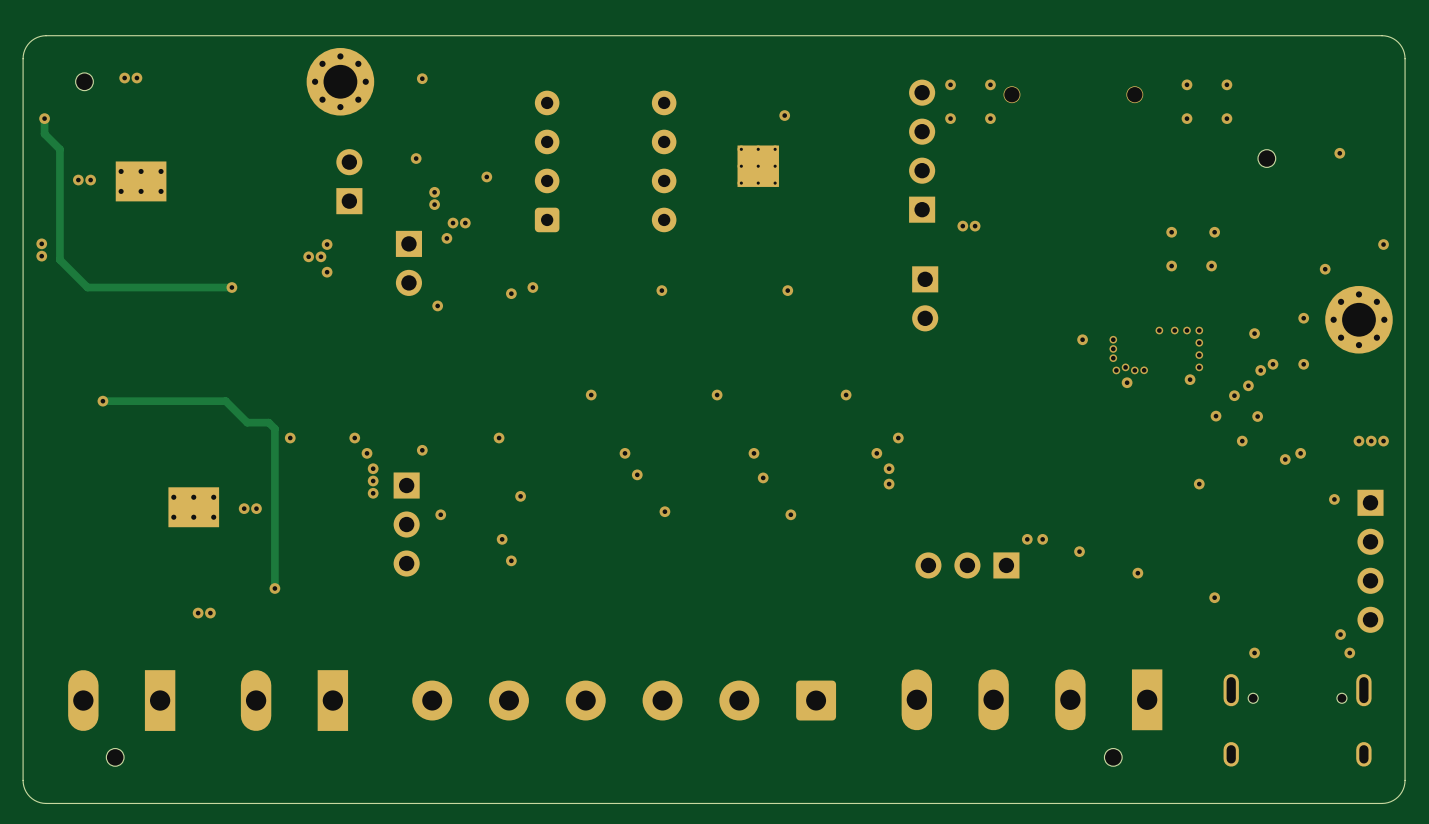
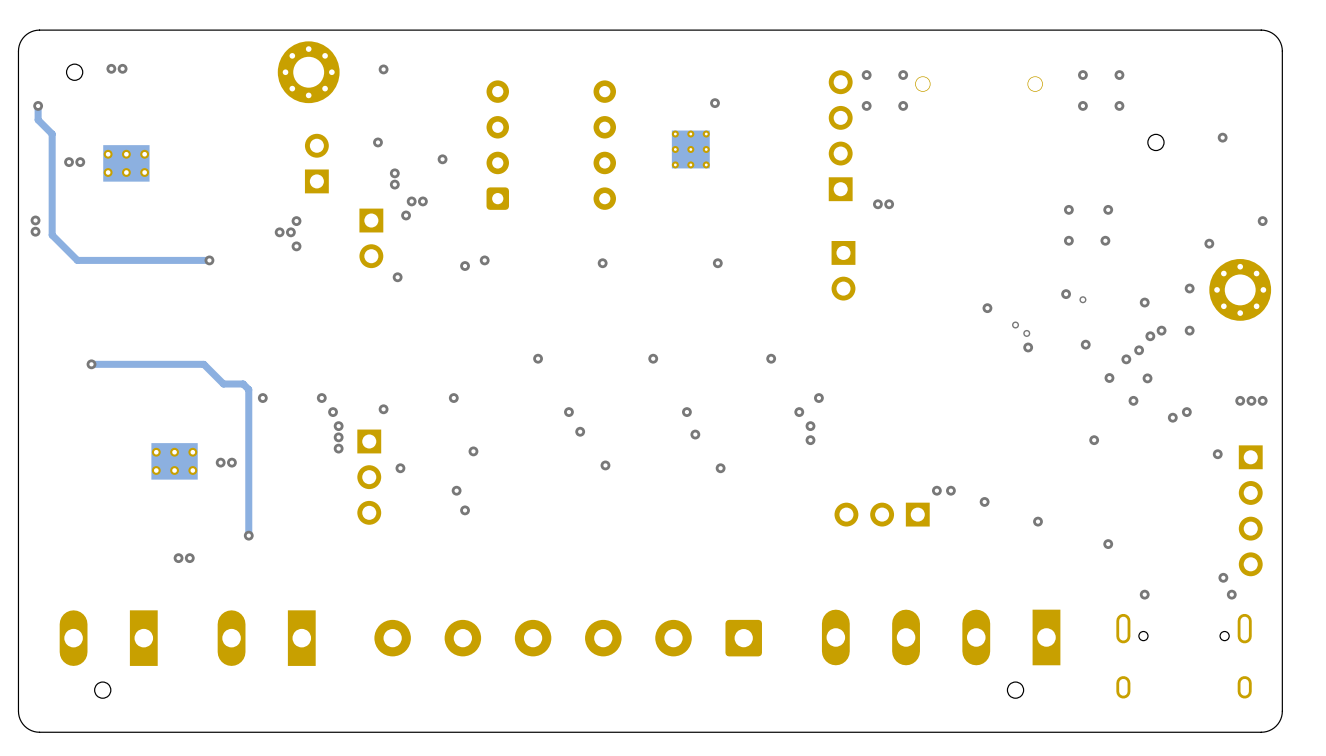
via: none -> (1066, 294)
via: (1159, 330) -> none
via: (1174, 330) -> none
via: (1199, 330) -> none
via: (1113, 339) -> none
via: (1199, 342) -> none
via: (1113, 348) -> none
via: (1199, 355) -> none
via: (1199, 367) -> none
via: (1116, 370) -> none
via: (1134, 370) -> none
via: (1144, 370) -> none

